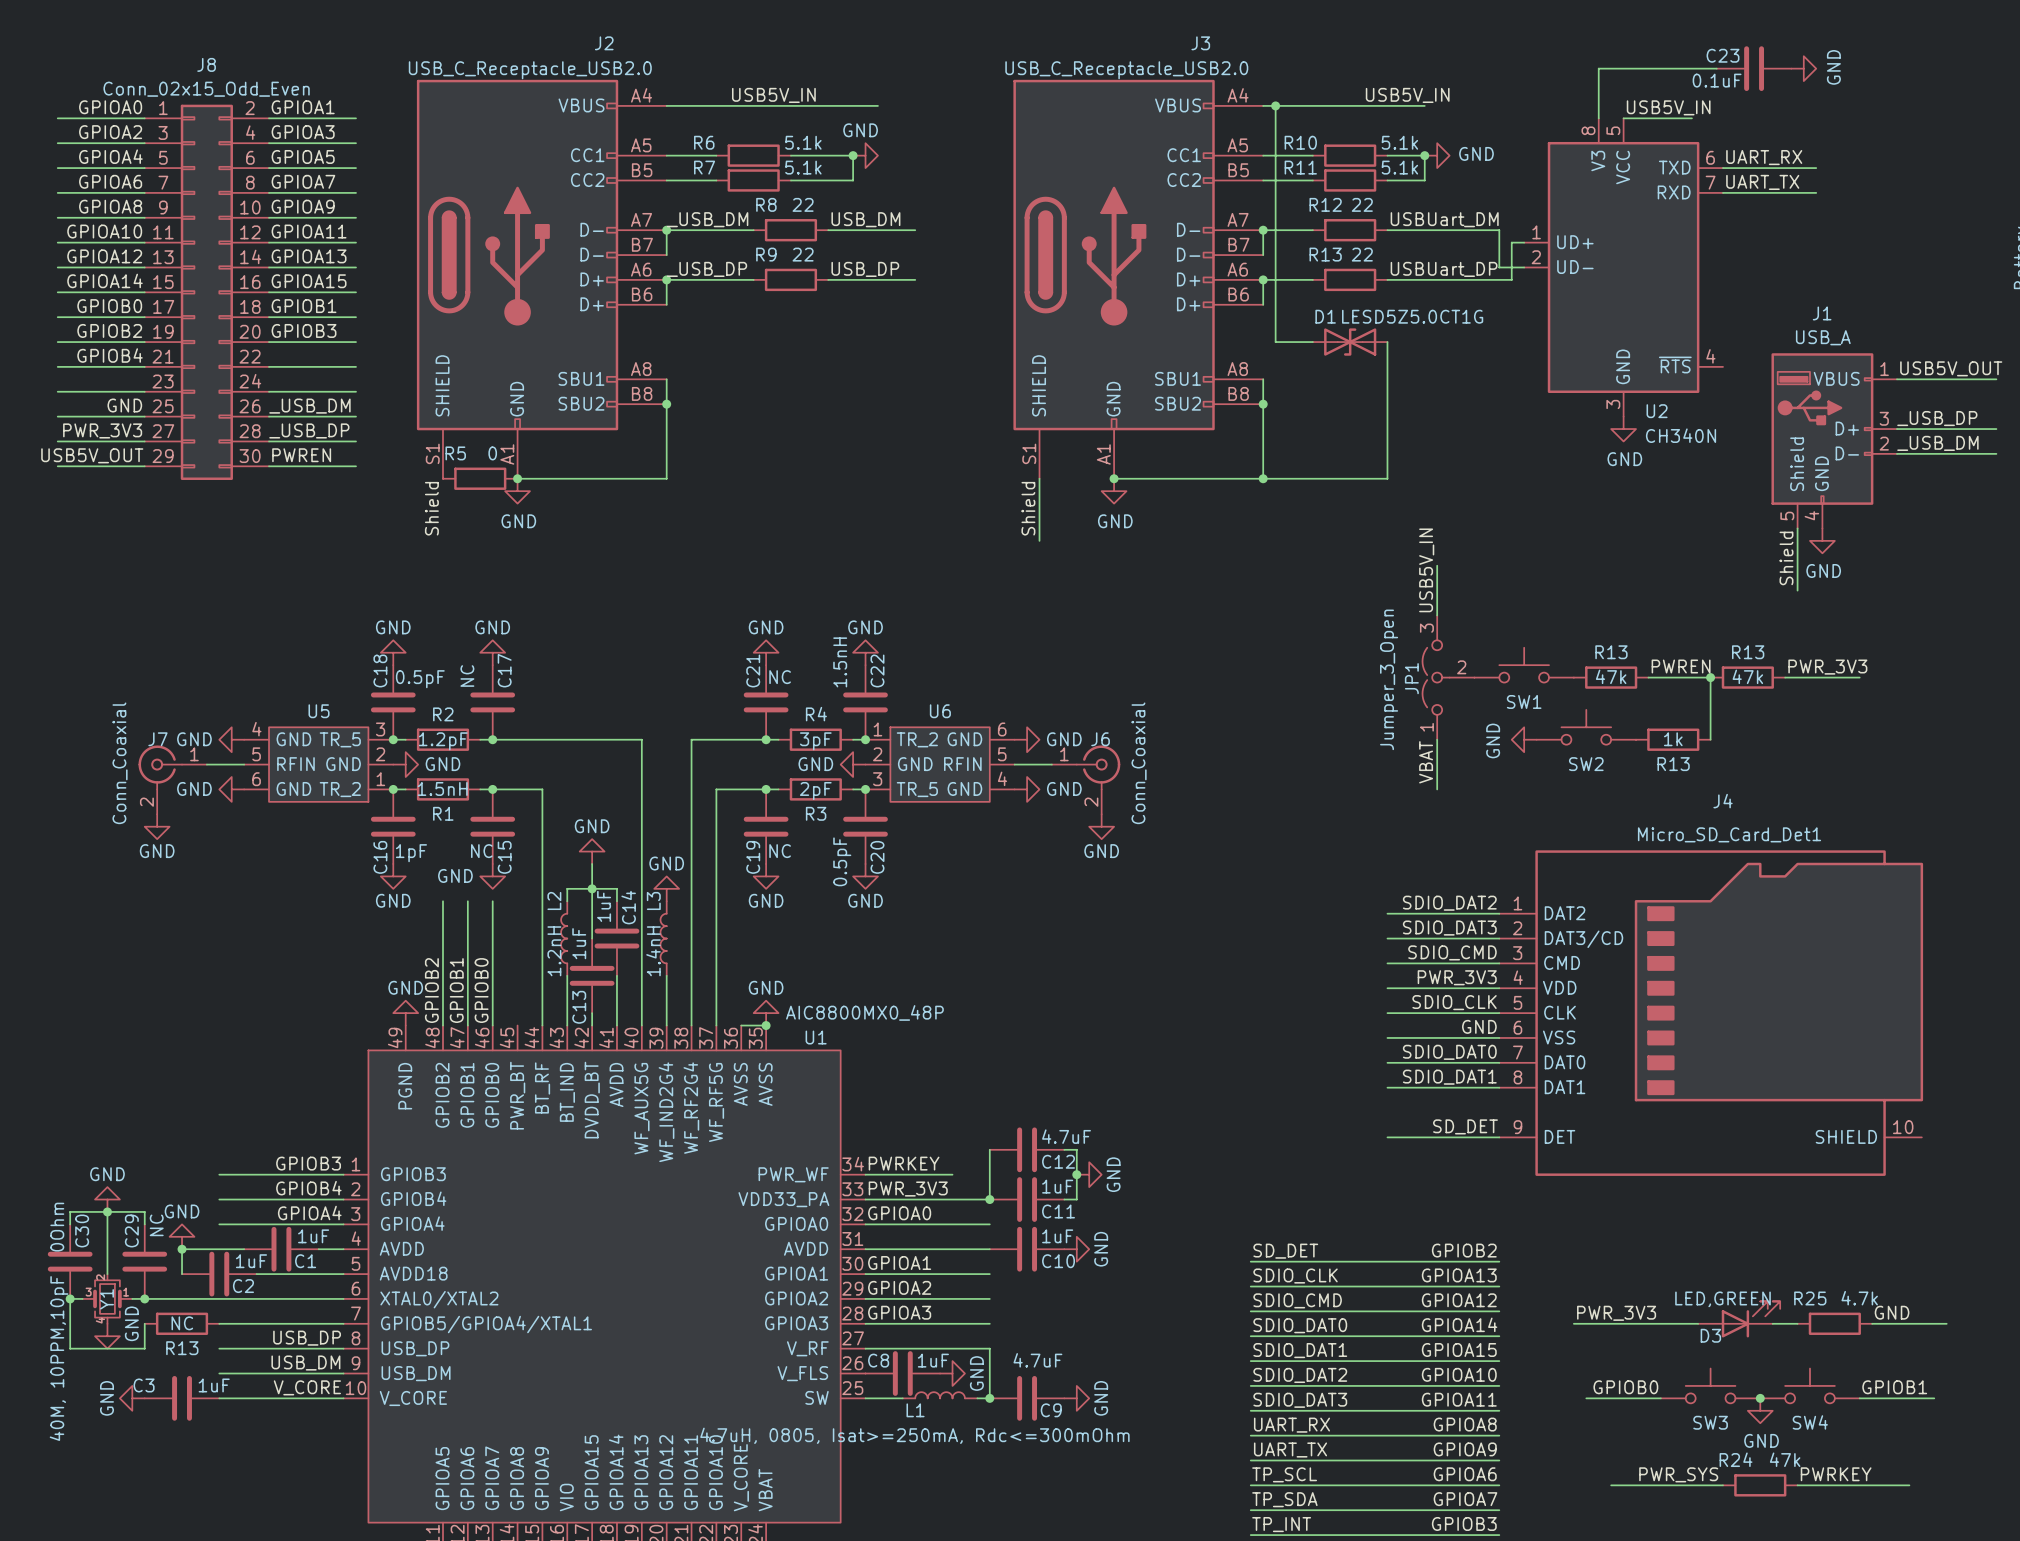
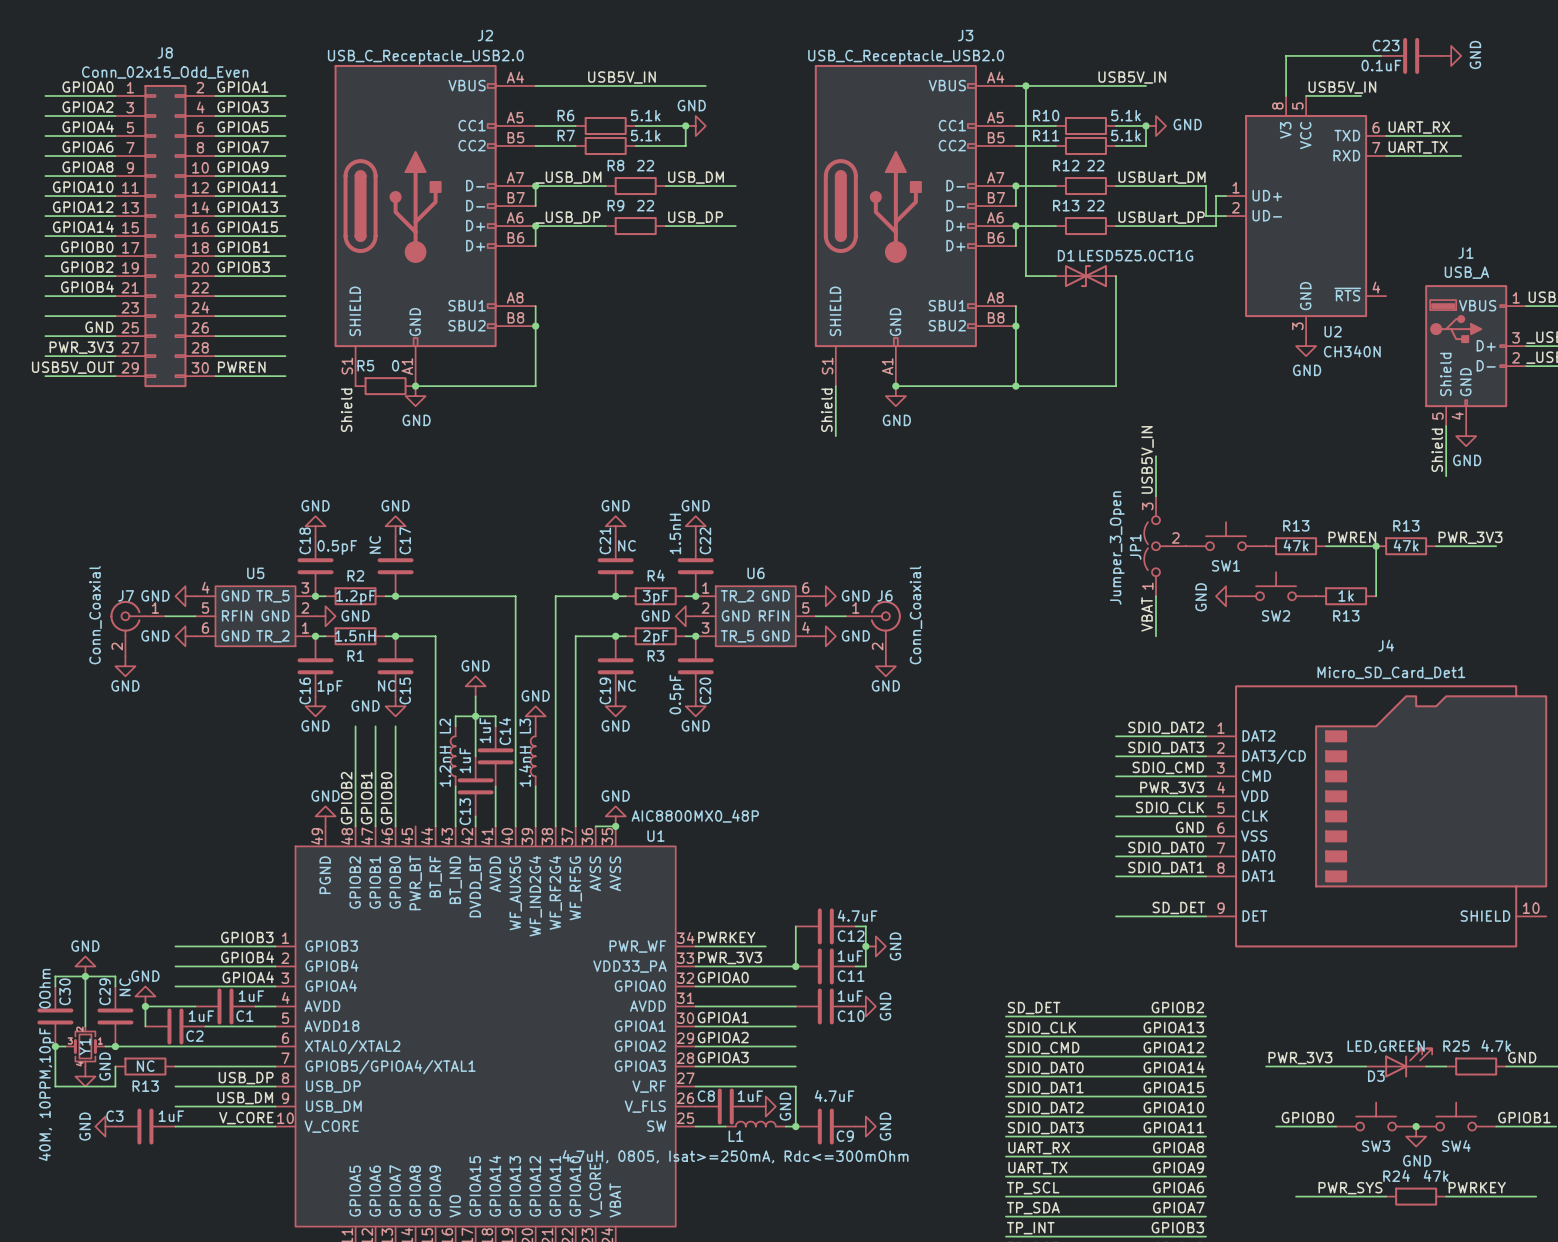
label: _USB_DM (309, 406) -> none
label: _USB_DP (309, 430) -> none

